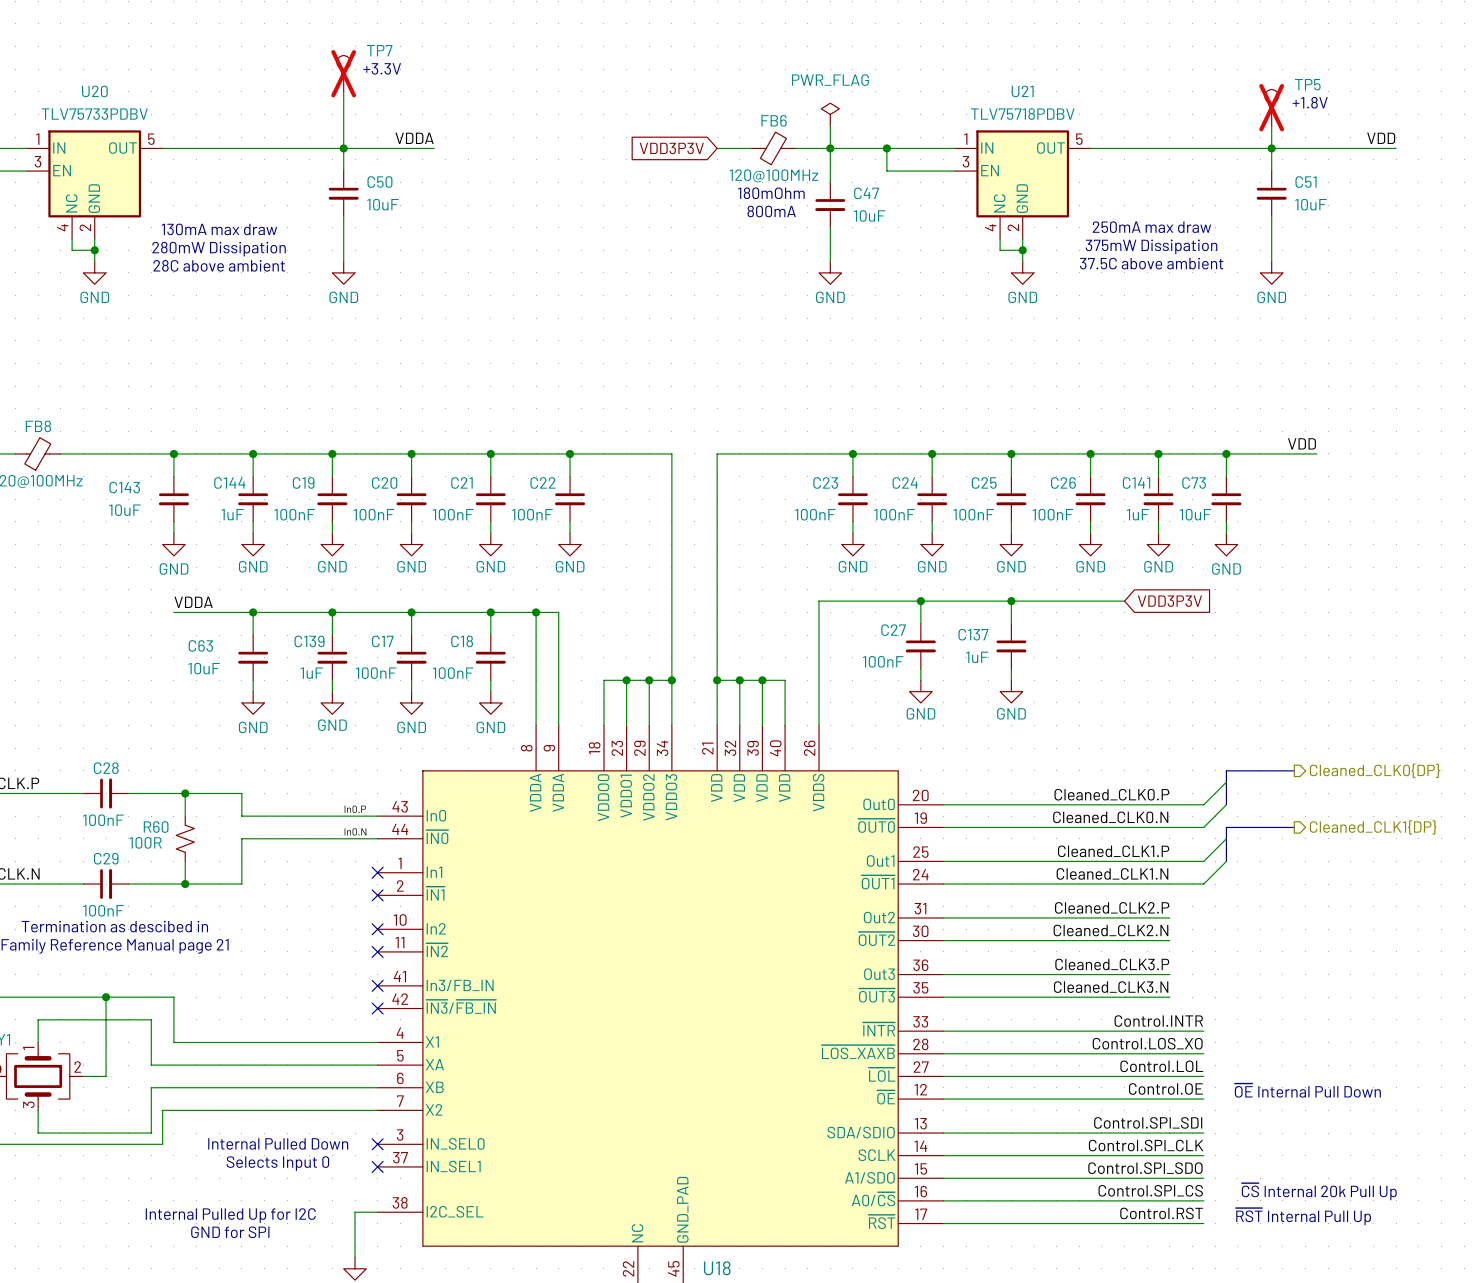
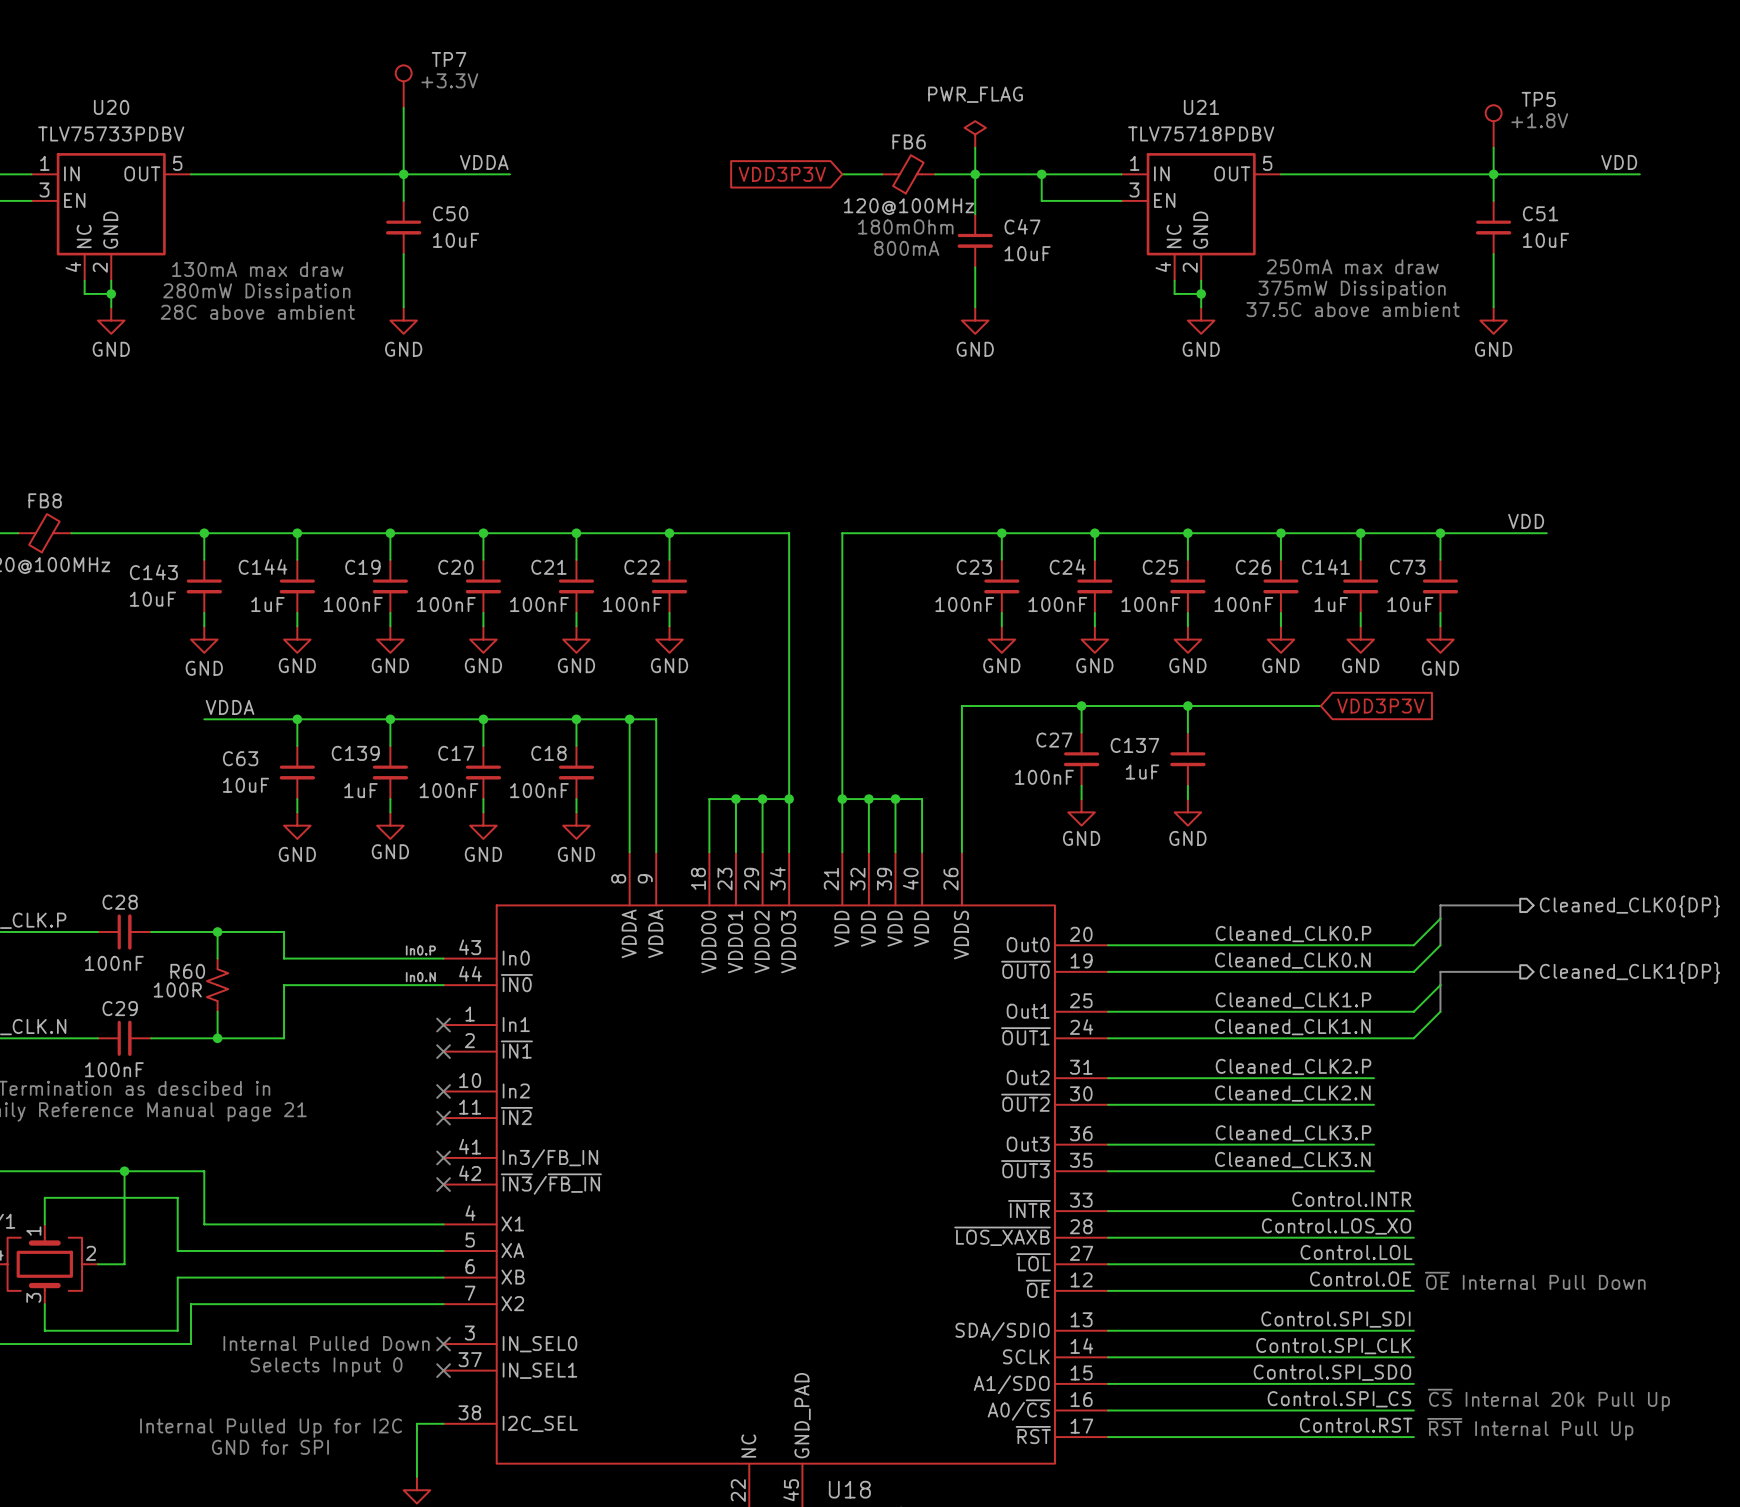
TP7 do-not-place cross: (343, 73) -> none
TP5 do-not-place cross: (1271, 107) -> none

